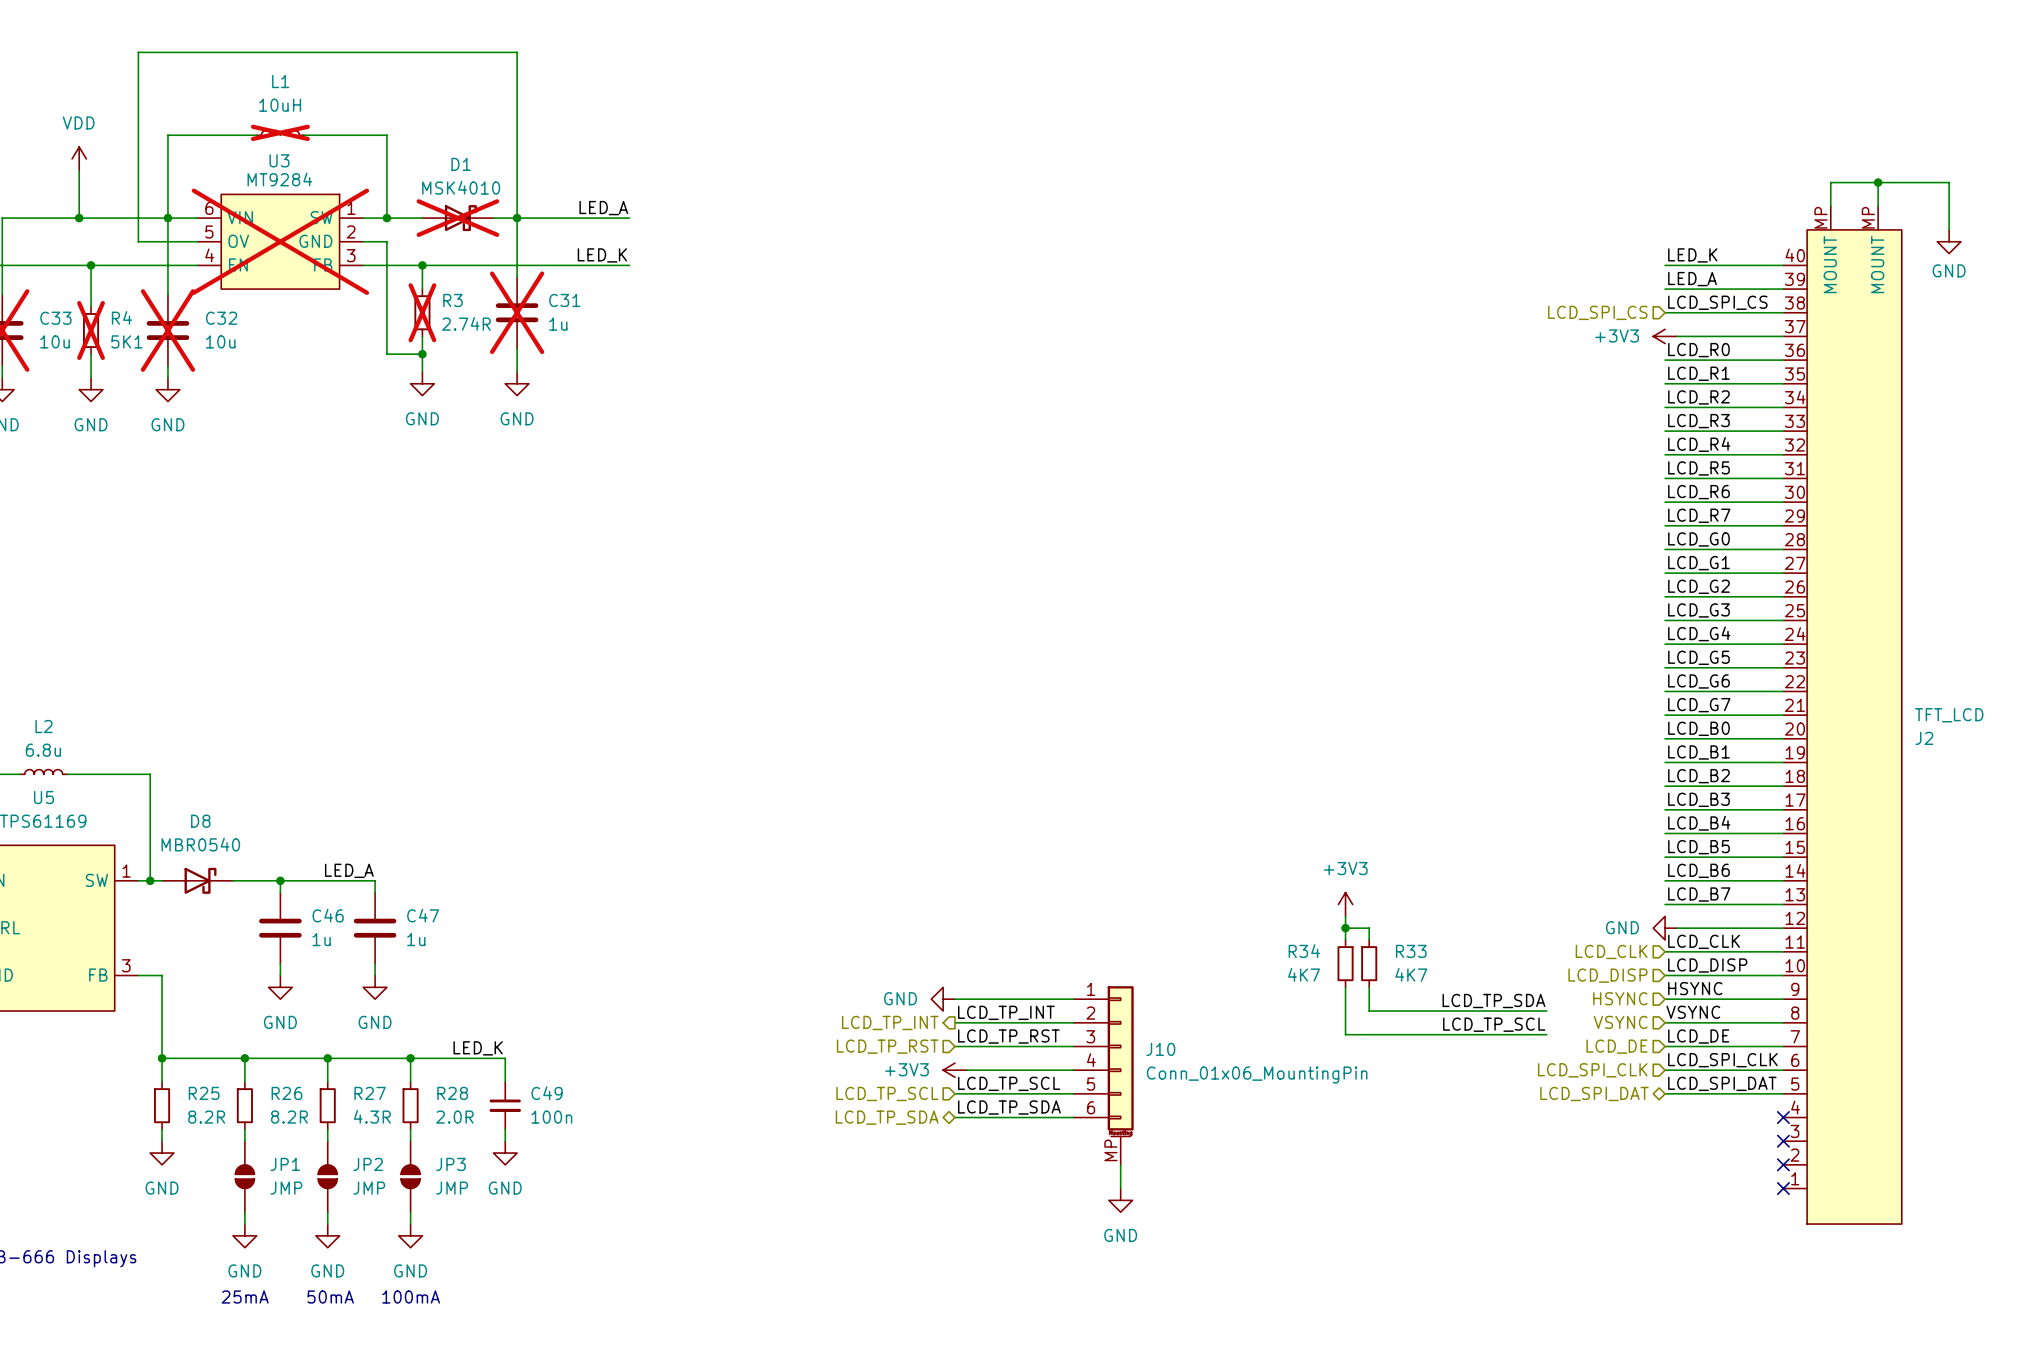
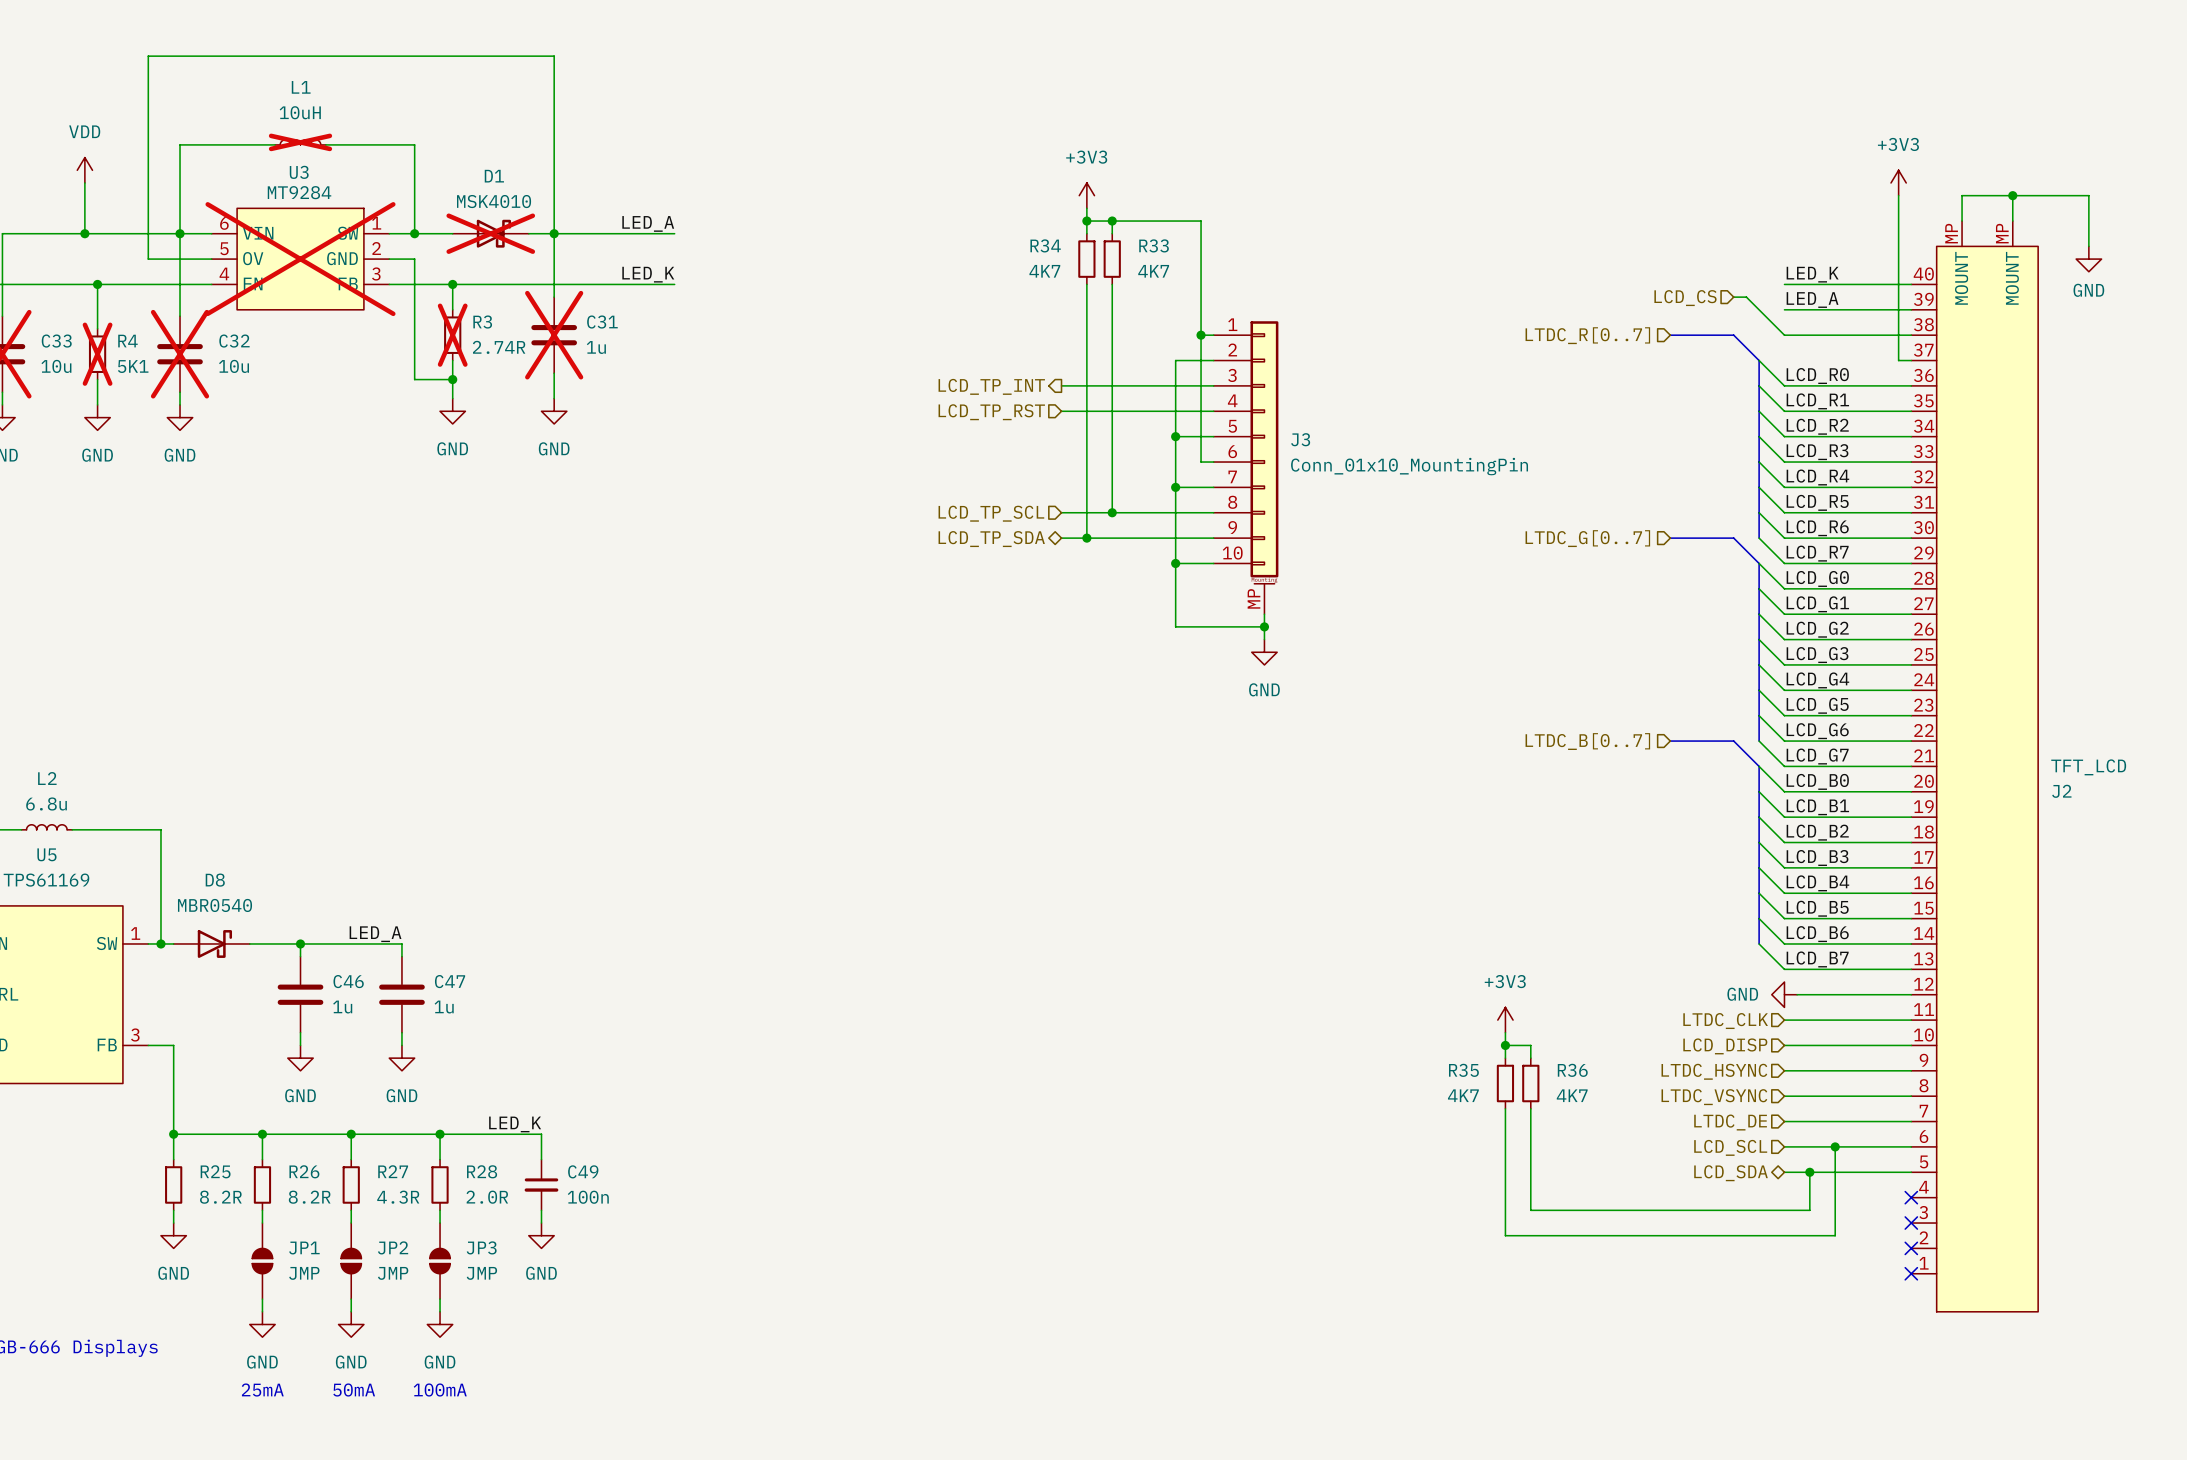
power symbol: none -> +3V3 (1086, 195)
wire: none -> (1086, 208) (1086, 233)
wire: none -> (1086, 221) (1201, 221) (1201, 462) (1213, 462)
junction: none -> (1086, 221)
wire: none -> (1112, 221) (1112, 233)
junction: none -> (1112, 221)
wire: none -> (1086, 284) (1086, 538)
wire: none -> (1112, 284) (1112, 512)
hierarchical label: none -> LCD_CS (1685, 298)
wire: none -> (1733, 297) (1746, 297) (1784, 335)
label: LCD_SPI_CS (1717, 302) -> none
wire: none -> (1201, 335) (1213, 335)
junction: none -> (1201, 335)
bus: none -> (1670, 335) (1733, 335) (1759, 360) (1759, 538)
hierarchical label: LCD_SPI_CS (1597, 312) -> none
hierarchical label: none -> LTDC_R[0..7] (1587, 335)
wire: none -> (1213, 360) (1175, 360) (1175, 626) (1264, 626)
wire: none -> (1759, 360) (1784, 385)
power symbol rotation: 0° (1665, 336) -> 90° clockwise (1898, 182)
power symbol position: +3V3 (1665, 336) -> +3V3 (1898, 182)
wire: (1676, 336) (1771, 336) -> (1898, 195) (1898, 360)
hierarchical label: none -> LCD_TP_INT (991, 386)
wire: none -> (1061, 385) (1213, 385)
wire: none -> (1759, 385) (1784, 411)
hierarchical label: none -> LCD_TP_RST (991, 412)
wire: none -> (1061, 411) (1213, 411)
wire: none -> (1759, 411) (1784, 436)
wire: none -> (1175, 436) (1213, 436)
junction: none -> (1175, 436)
wire: none -> (1759, 436) (1784, 462)
wire: none -> (1759, 462) (1784, 487)
J3: none -> Conn_01x10_MountingPin (1246, 467)
wire: none -> (1175, 487) (1213, 487)
junction: none -> (1175, 487)
wire: none -> (1759, 487) (1784, 512)
hierarchical label: none -> LCD_TP_SCL (991, 513)
wire: none -> (1061, 512) (1213, 512)
junction: none -> (1112, 512)
wire: none -> (1759, 512) (1784, 538)
hierarchical label: none -> LCD_TP_SDA (991, 539)
wire: none -> (1061, 538) (1213, 538)
junction: none -> (1086, 538)
bus: none -> (1670, 538) (1733, 538) (1759, 563) (1759, 741)
wire: none -> (1759, 538) (1784, 563)
hierarchical label: none -> LTDC_G[0..7] (1587, 538)
wire: none -> (1175, 563) (1213, 563)
junction: none -> (1175, 563)
wire: none -> (1759, 563) (1784, 588)
wire: none -> (1759, 588) (1784, 614)
wire: none -> (1264, 614) (1264, 639)
wire: none -> (1759, 614) (1784, 639)
junction: none -> (1264, 626)
wire: none -> (1759, 639) (1784, 664)
power symbol: none -> GND (1264, 652)
wire: none -> (1759, 664) (1784, 690)
wire: none -> (1759, 690) (1784, 715)
wire: none -> (1759, 715) (1784, 741)
bus: none -> (1670, 741) (1733, 741) (1759, 766) (1759, 943)
wire: none -> (1759, 741) (1784, 766)
hierarchical label: none -> LTDC_B[0..7] (1587, 741)
wire: none -> (1759, 766) (1784, 791)
wire: none -> (1759, 791) (1784, 817)
wire: none -> (1759, 817) (1784, 842)
wire: none -> (1759, 842) (1784, 867)
wire: none -> (1759, 867) (1784, 893)
wire: none -> (1759, 893) (1784, 918)
wire: none -> (1759, 918) (1784, 943)
wire: none -> (1759, 943) (1784, 969)
power symbol position: +3V3 (1345, 904) -> +3V3 (1505, 1020)
wire: (1345, 916) (1345, 940) -> (1505, 1032) (1505, 1058)
wire: (1345, 928) (1369, 928) (1369, 940) -> (1505, 1045) (1530, 1045) (1530, 1058)
junction: (1345, 928) -> none
label: LCD_CLK (1704, 941) -> none
hierarchical label: LCD_CLK (1611, 951) -> LTDC_CLK (1725, 1021)
R34 position: (1345, 963) -> (1086, 259)
R33 position: (1369, 963) -> (1112, 259)
label: LCD_DISP (1707, 965) -> none
junction: none -> (1505, 1045)
wire: (1345, 987) (1345, 1034) (1546, 1034) -> none
wire: (1369, 987) (1369, 1011) (1546, 1011) -> none
label: HSYNC (1695, 988) -> none
hierarchical label: HSYNC (1620, 998) -> LTDC_HSYNC (1714, 1071)
power symbol: GND (943, 999) -> none
wire: (954, 999) (1073, 999) -> none
label: LCD_TP_SDA (1493, 1001) -> none
R35: none -> 4K7 (1505, 1083)
R36: none -> 4K7 (1530, 1083)
label: LCD_TP_INT (1006, 1012) -> none
label: VSYNC (1693, 1012) -> none
hierarchical label: LCD_TP_INT (890, 1022) -> none
wire: (954, 1022) (1073, 1022) -> none
hierarchical label: VSYNC (1620, 1022) -> LTDC_VSYNC (1714, 1097)
label: LCD_TP_SCL (1494, 1024) -> none
wire: none -> (1505, 1108) (1505, 1235) (1835, 1235) (1835, 1146)
wire: none -> (1530, 1108) (1530, 1210) (1809, 1210) (1809, 1172)
label: LCD_TP_RST (1008, 1036) -> none
label: LCD_DE (1698, 1036) -> none
hierarchical label: LCD_TP_RST (887, 1046) -> none
wire: (954, 1046) (1073, 1046) -> none
hierarchical label: LCD_DE (1616, 1046) -> LTDC_DE (1730, 1122)
label: LCD_SPI_CLK (1722, 1060) -> none
power symbol: +3V3 (954, 1070) -> none
wire: (966, 1070) (1073, 1070) -> none
hierarchical label: LCD_SPI_CLK (1592, 1070) -> LCD_SCL (1730, 1147)
junction: none -> (1835, 1146)
J10: Conn_01x06_MountingPin (1103, 1075) -> none
label: LCD_TP_SCL (1009, 1083) -> none
label: LCD_SPI_DAT (1722, 1083) -> none
hierarchical label: LCD_TP_SCL (887, 1093) -> none
wire: (954, 1093) (1073, 1093) -> none
hierarchical label: LCD_SPI_DAT (1594, 1093) -> LCD_SDA (1731, 1173)
junction: none -> (1809, 1172)
label: LCD_TP_SDA (1009, 1107) -> none
hierarchical label: LCD_TP_SDA (887, 1117) -> none
wire: (954, 1117) (1073, 1117) -> none
wire: (1120, 1164) (1120, 1188) -> none
power symbol: GND (1120, 1200) -> none

